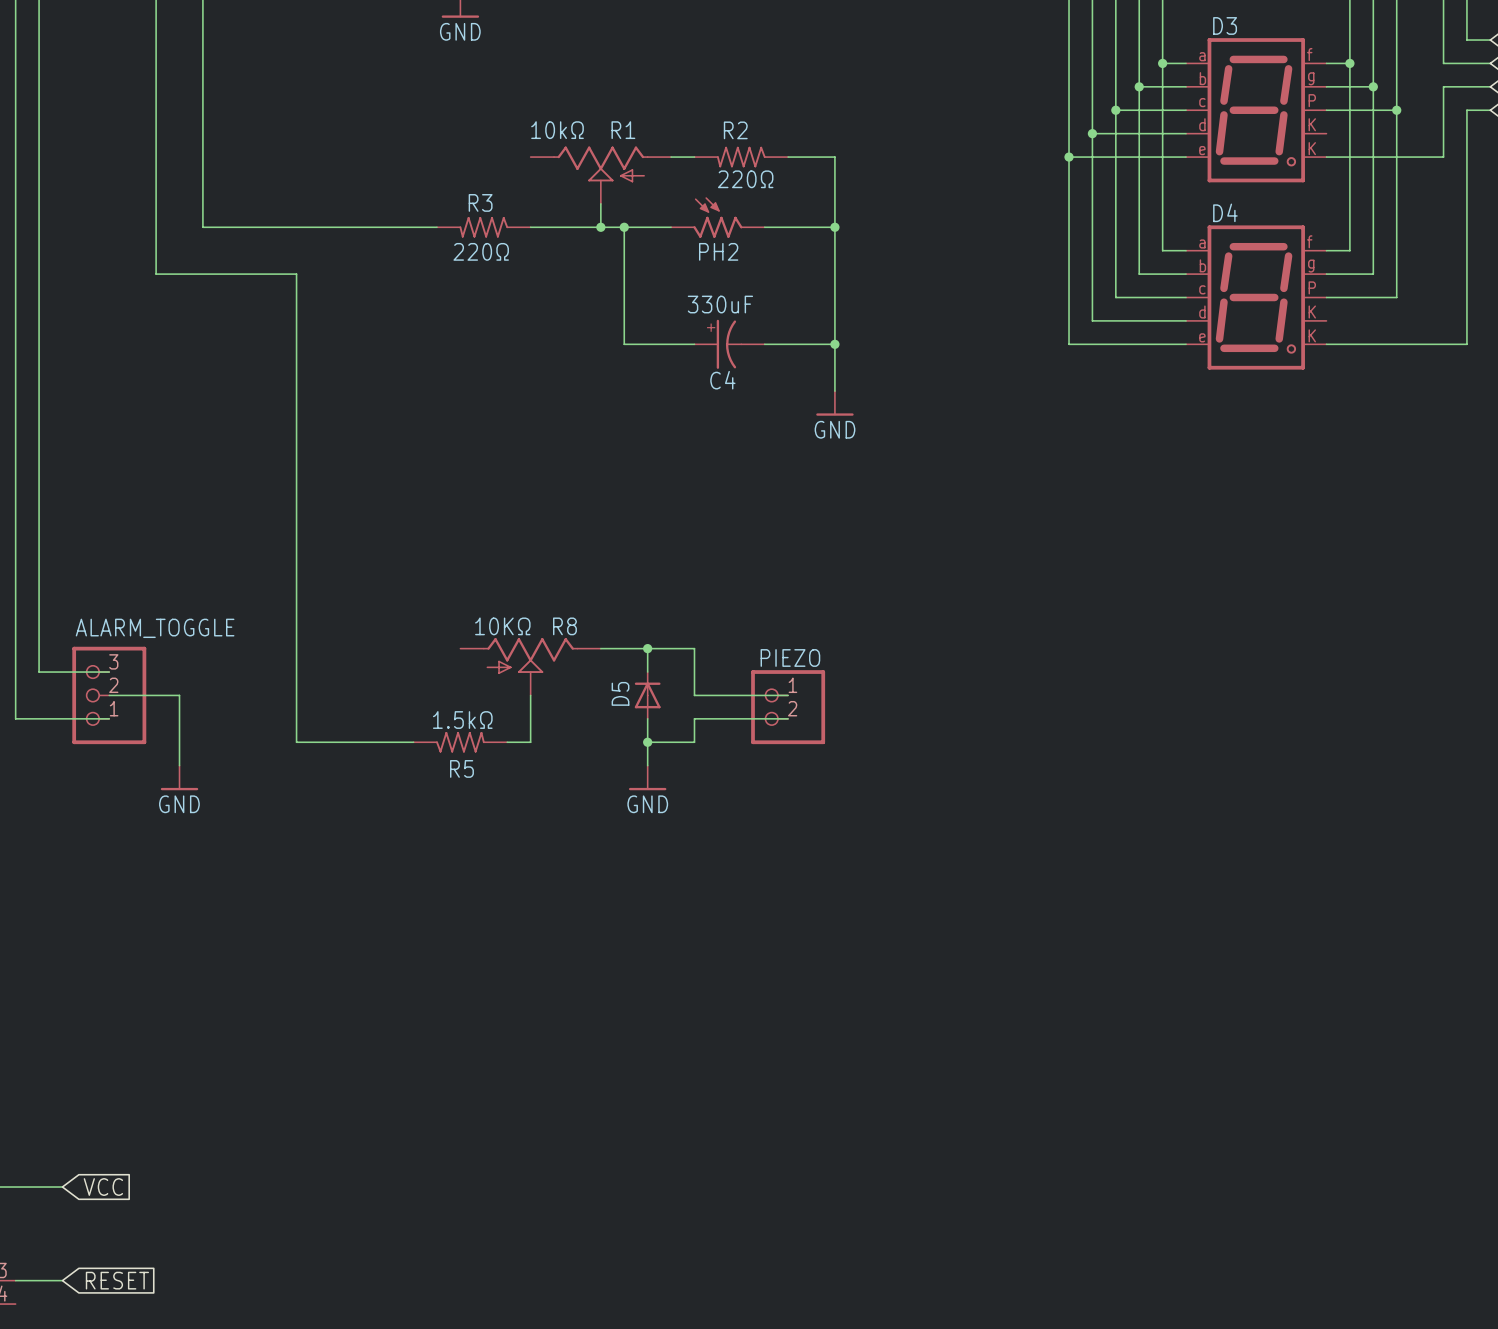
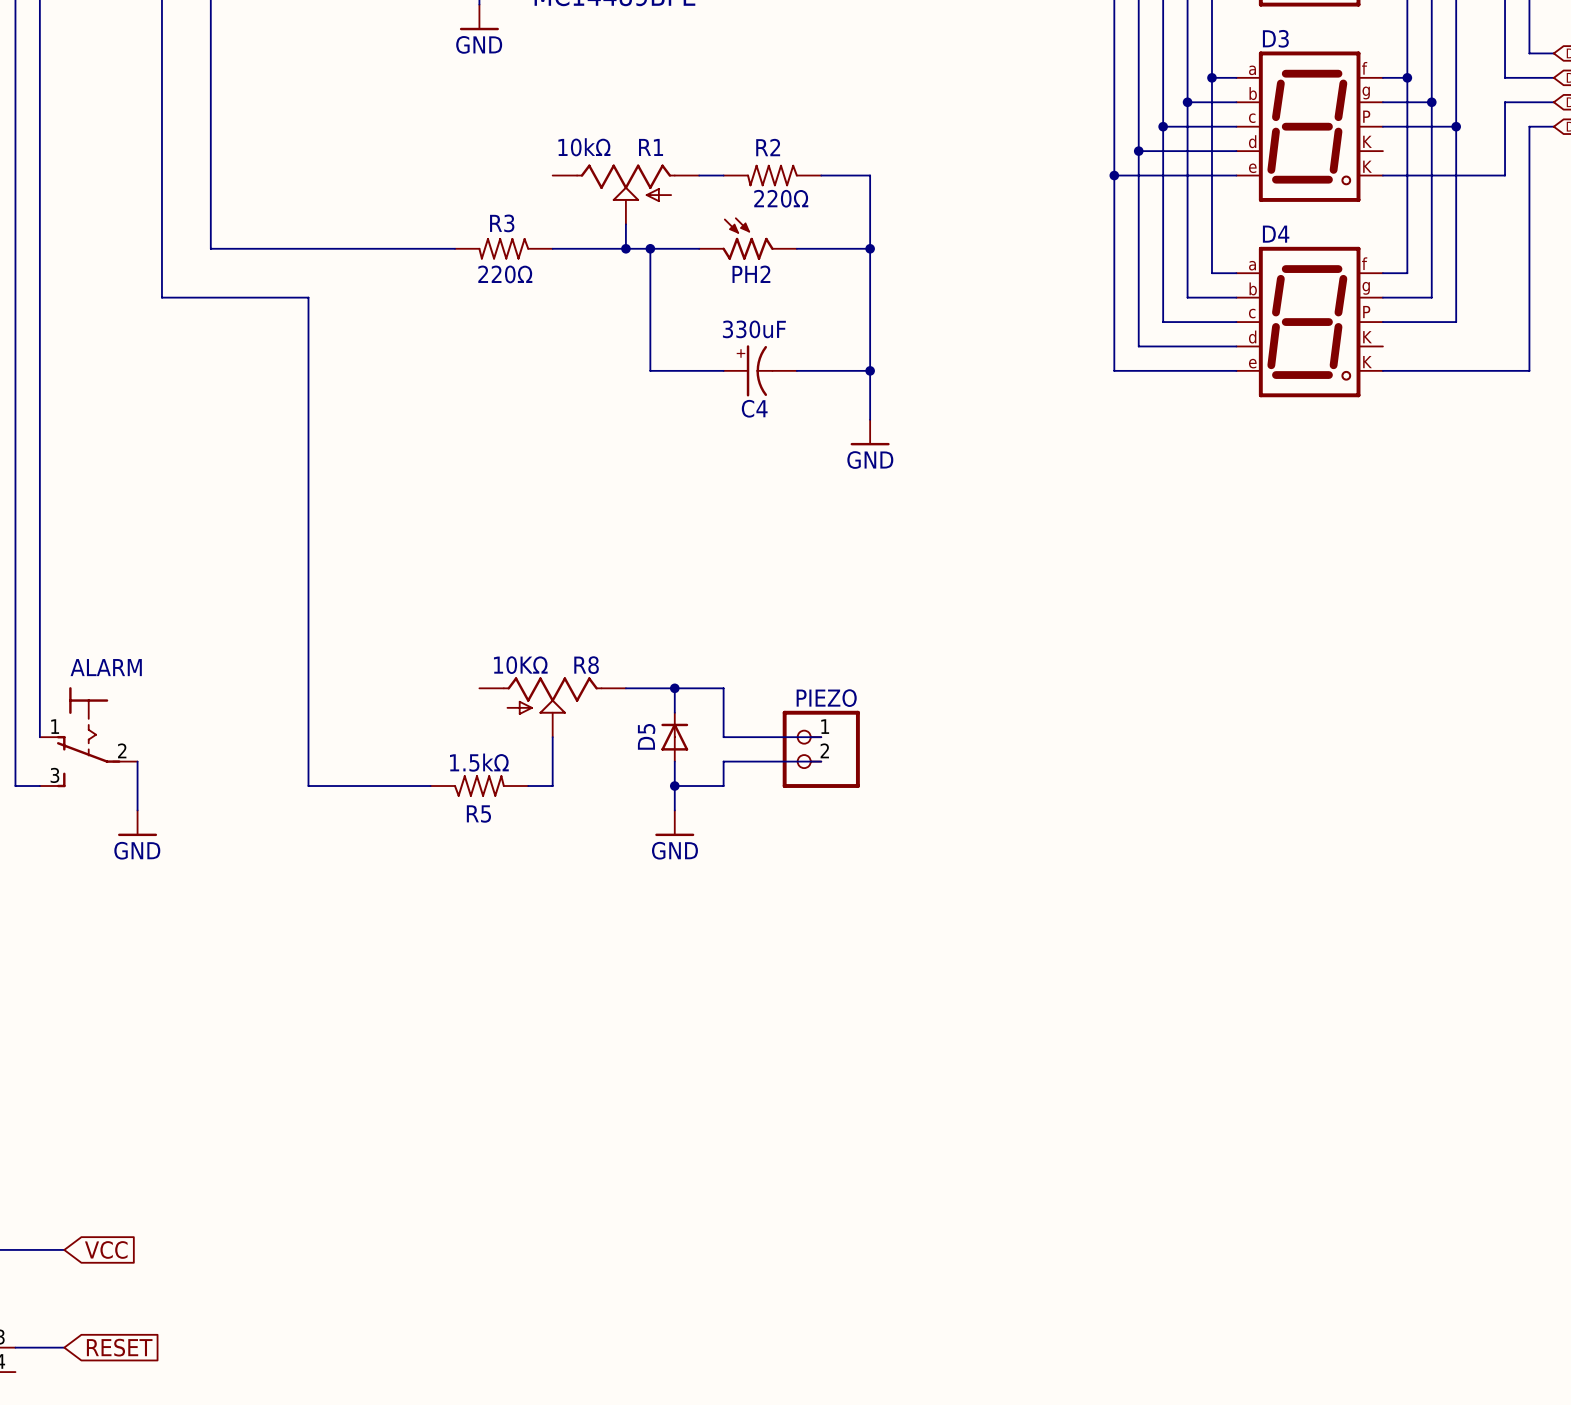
wire: (39, 672) (109, 672) -> (39, 712) (39, 737)
ALARM: none -> (88, 737)
wire: (109, 695) (179, 695) (179, 765) -> none
ALARM_TOGGLE: (109, 695) -> none
wire: (15, 718) (109, 718) -> (15, 761) (15, 786) (39, 786)
wire: none -> (137, 761) (137, 810)
power symbol position: GND (179, 777) -> GND (137, 823)

